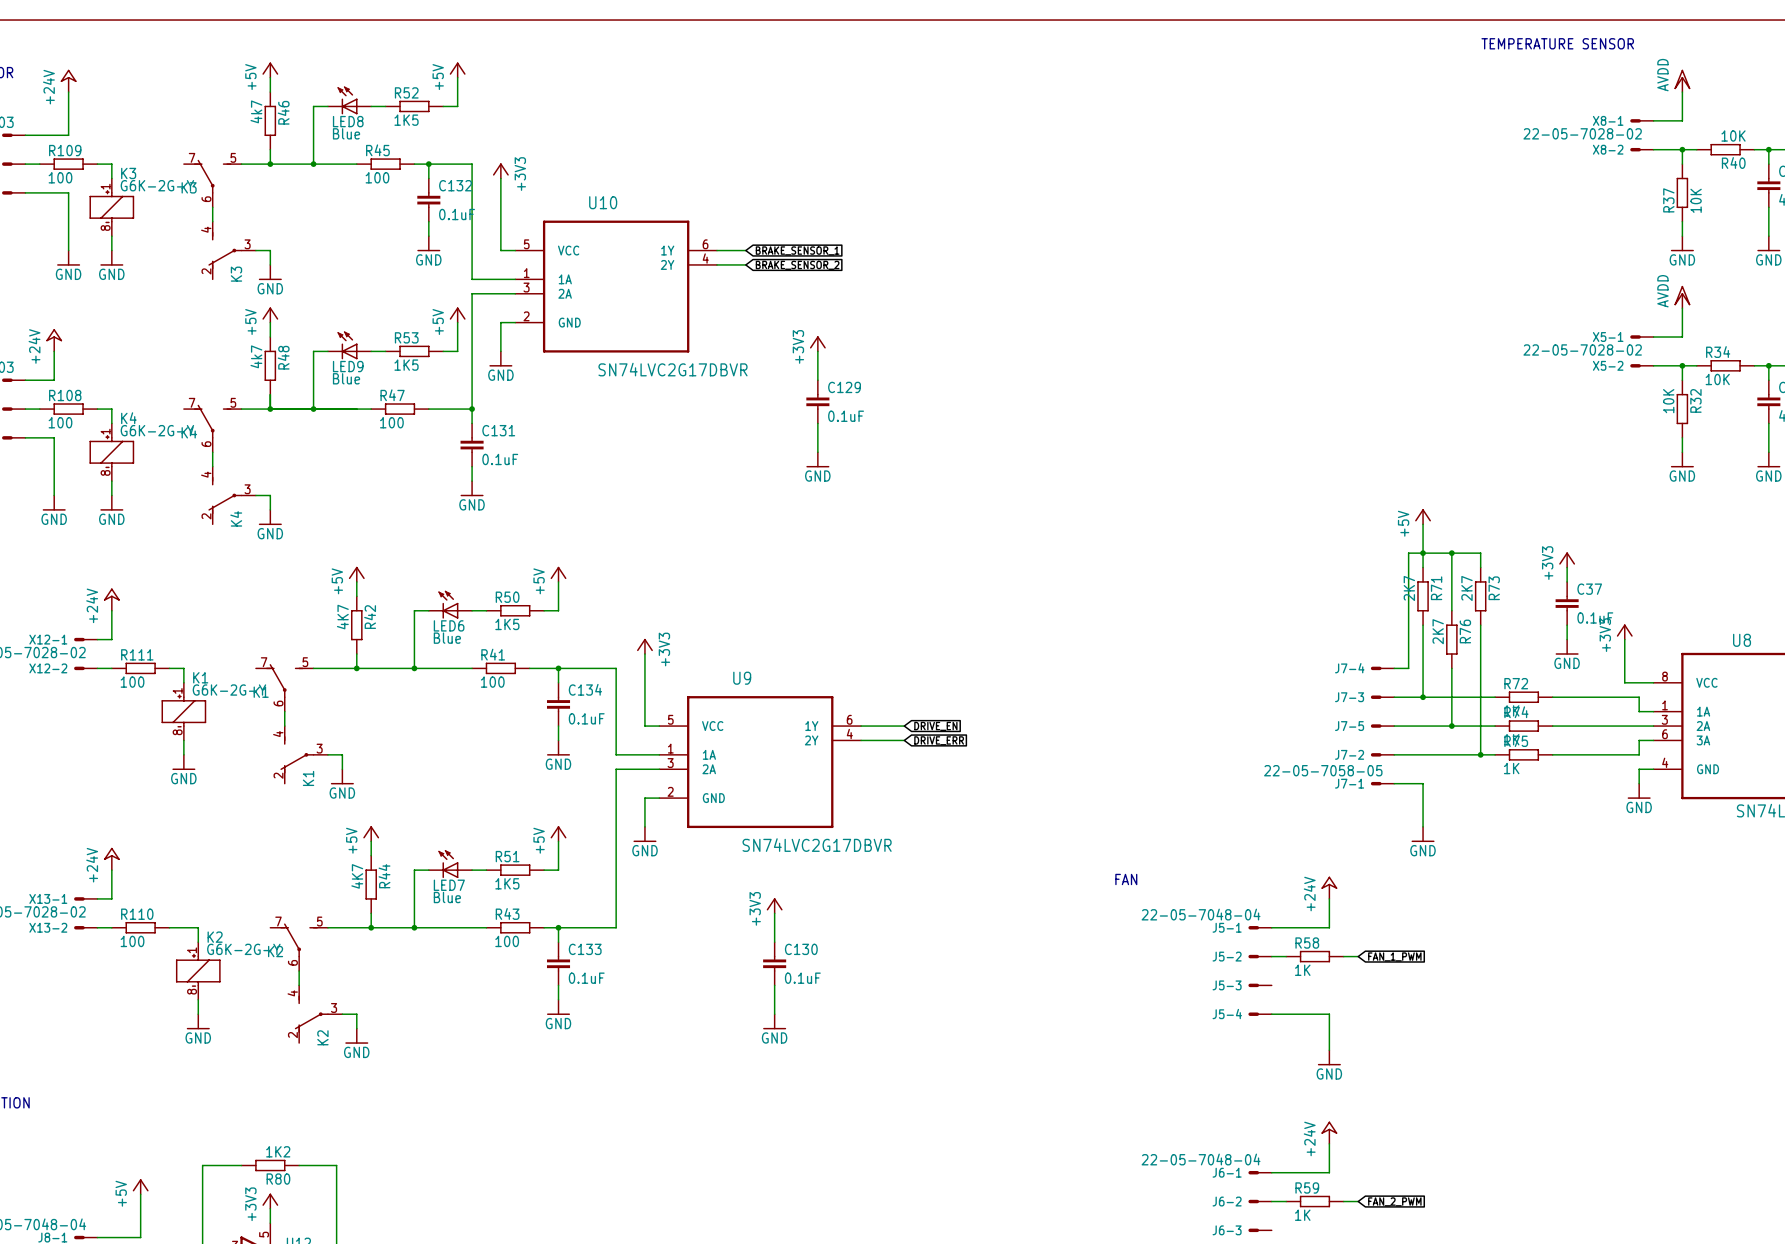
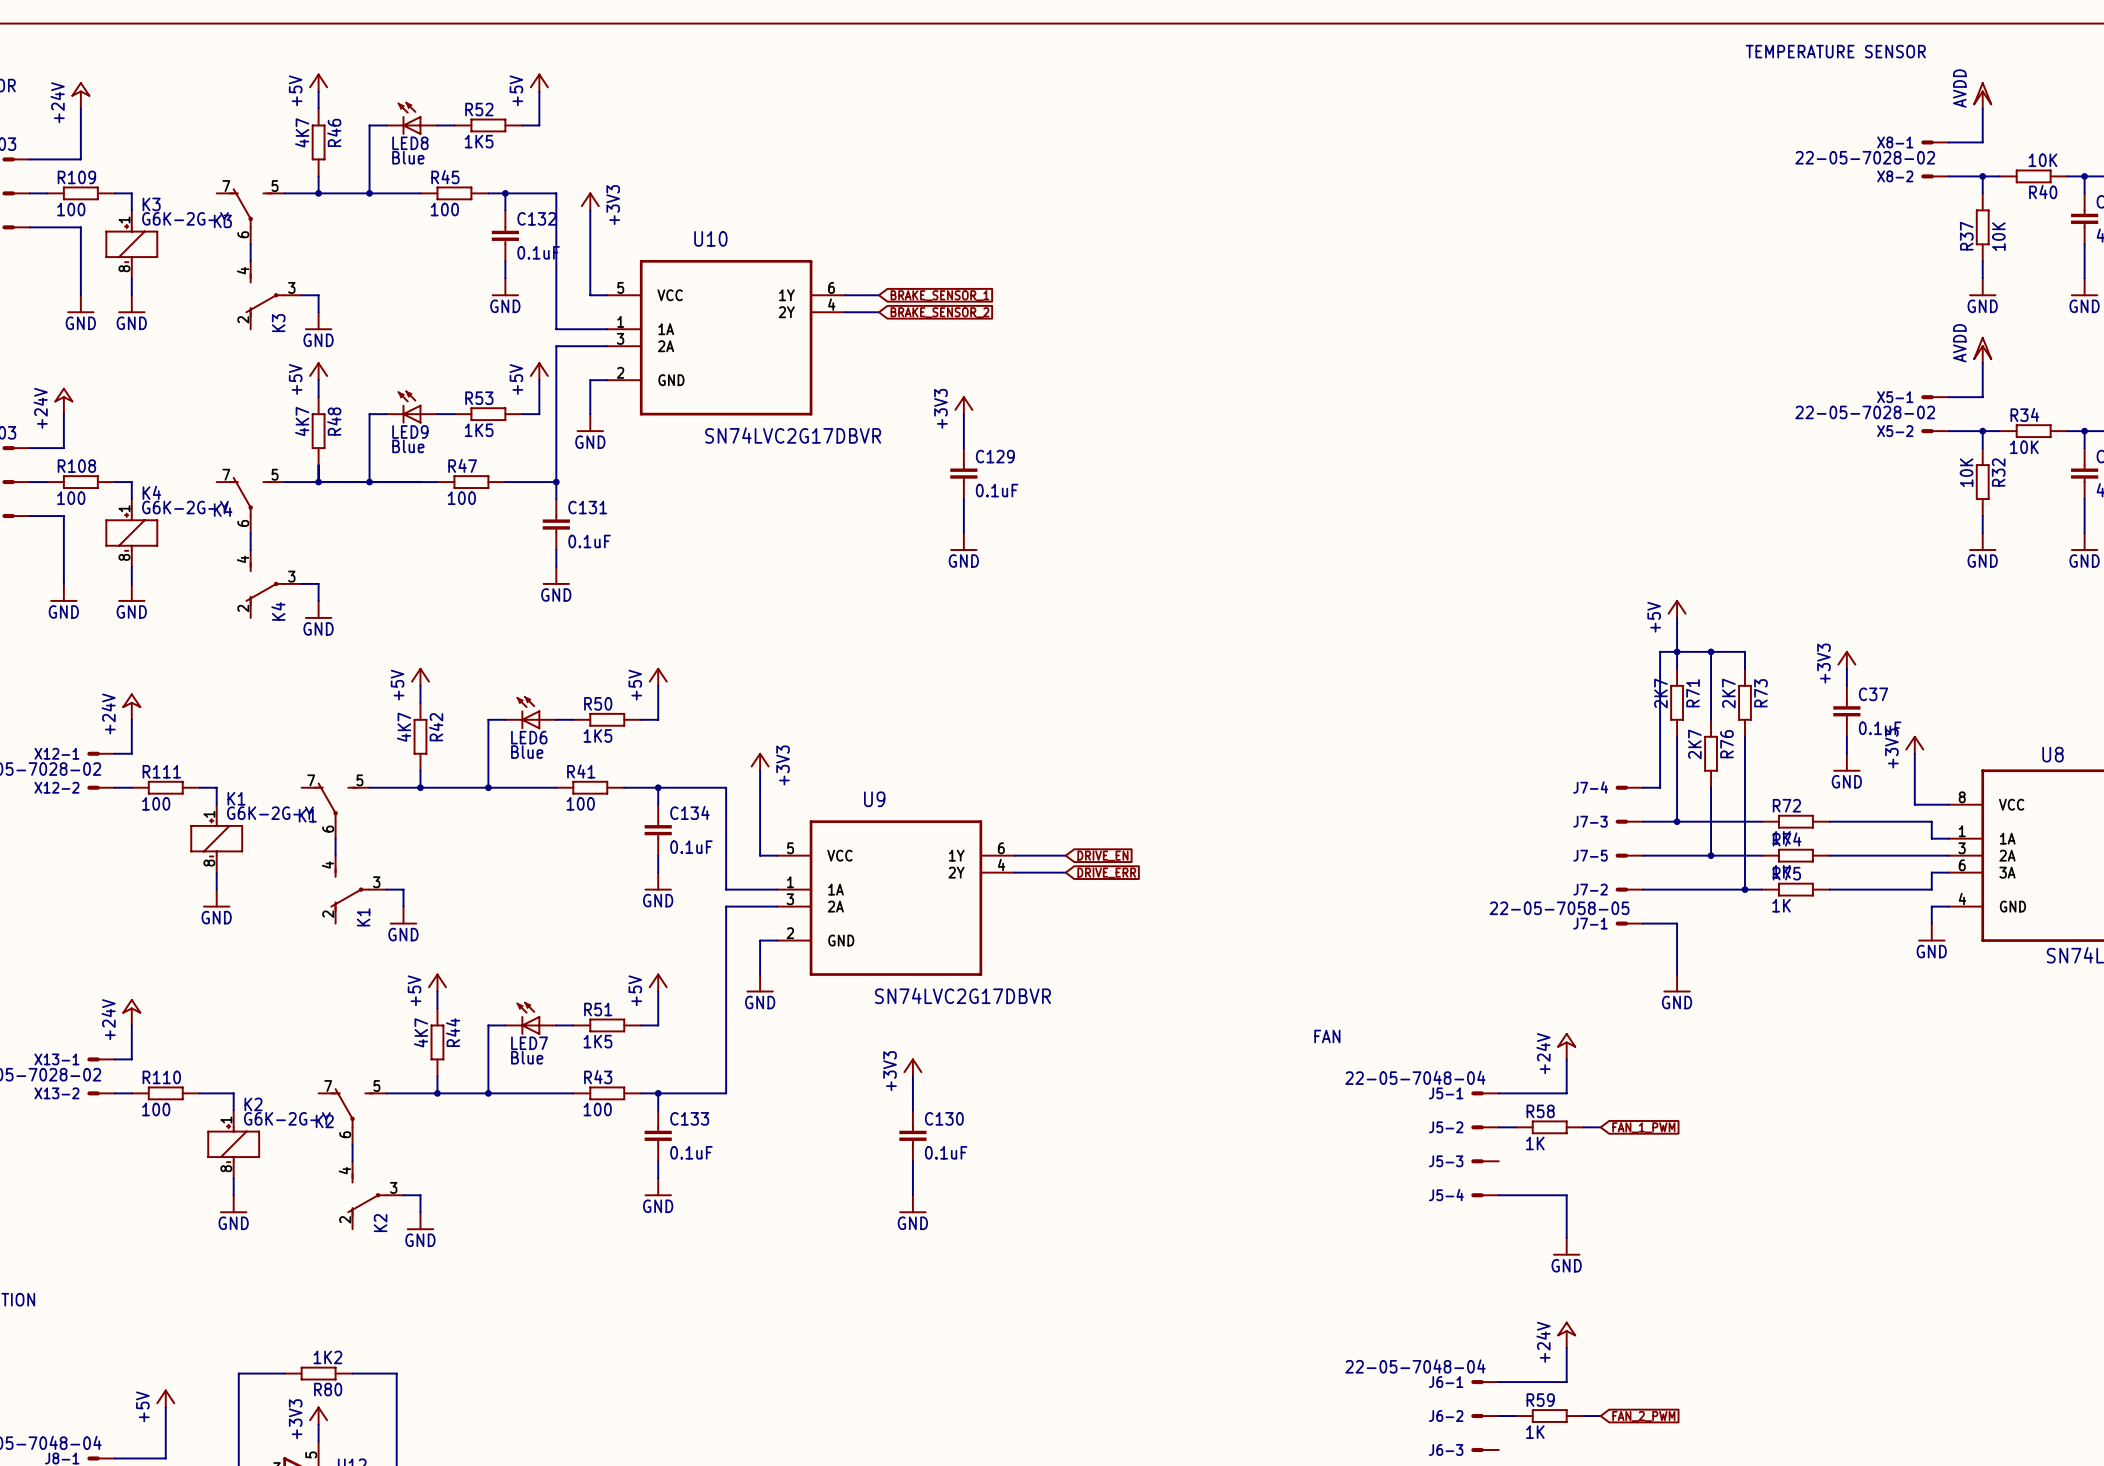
R46 value: 4k7 (256, 111) -> 4K7 (302, 132)
R48 value: 4k7 (256, 356) -> 4K7 (302, 421)

